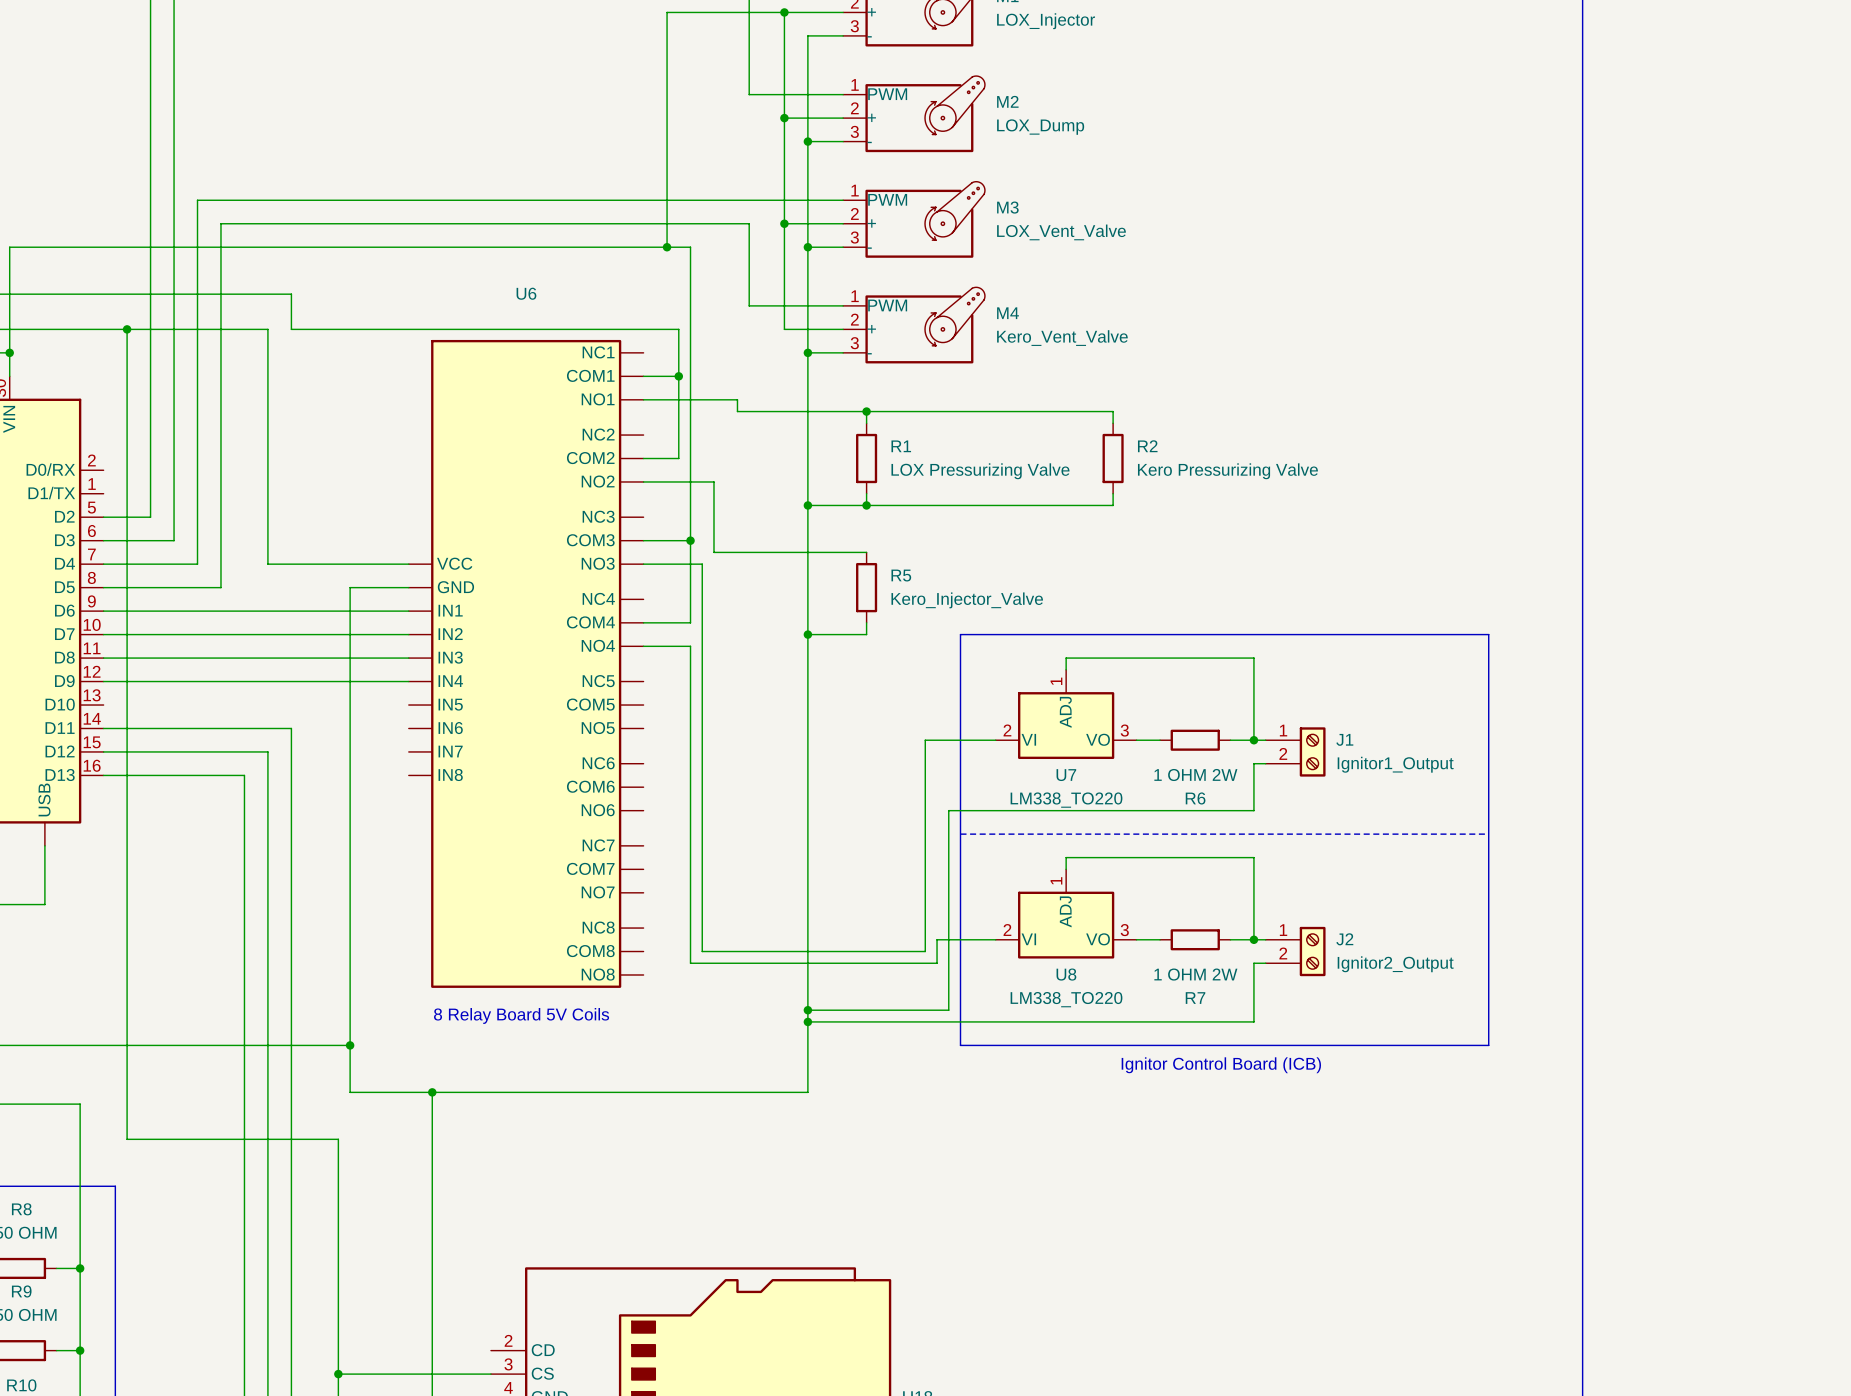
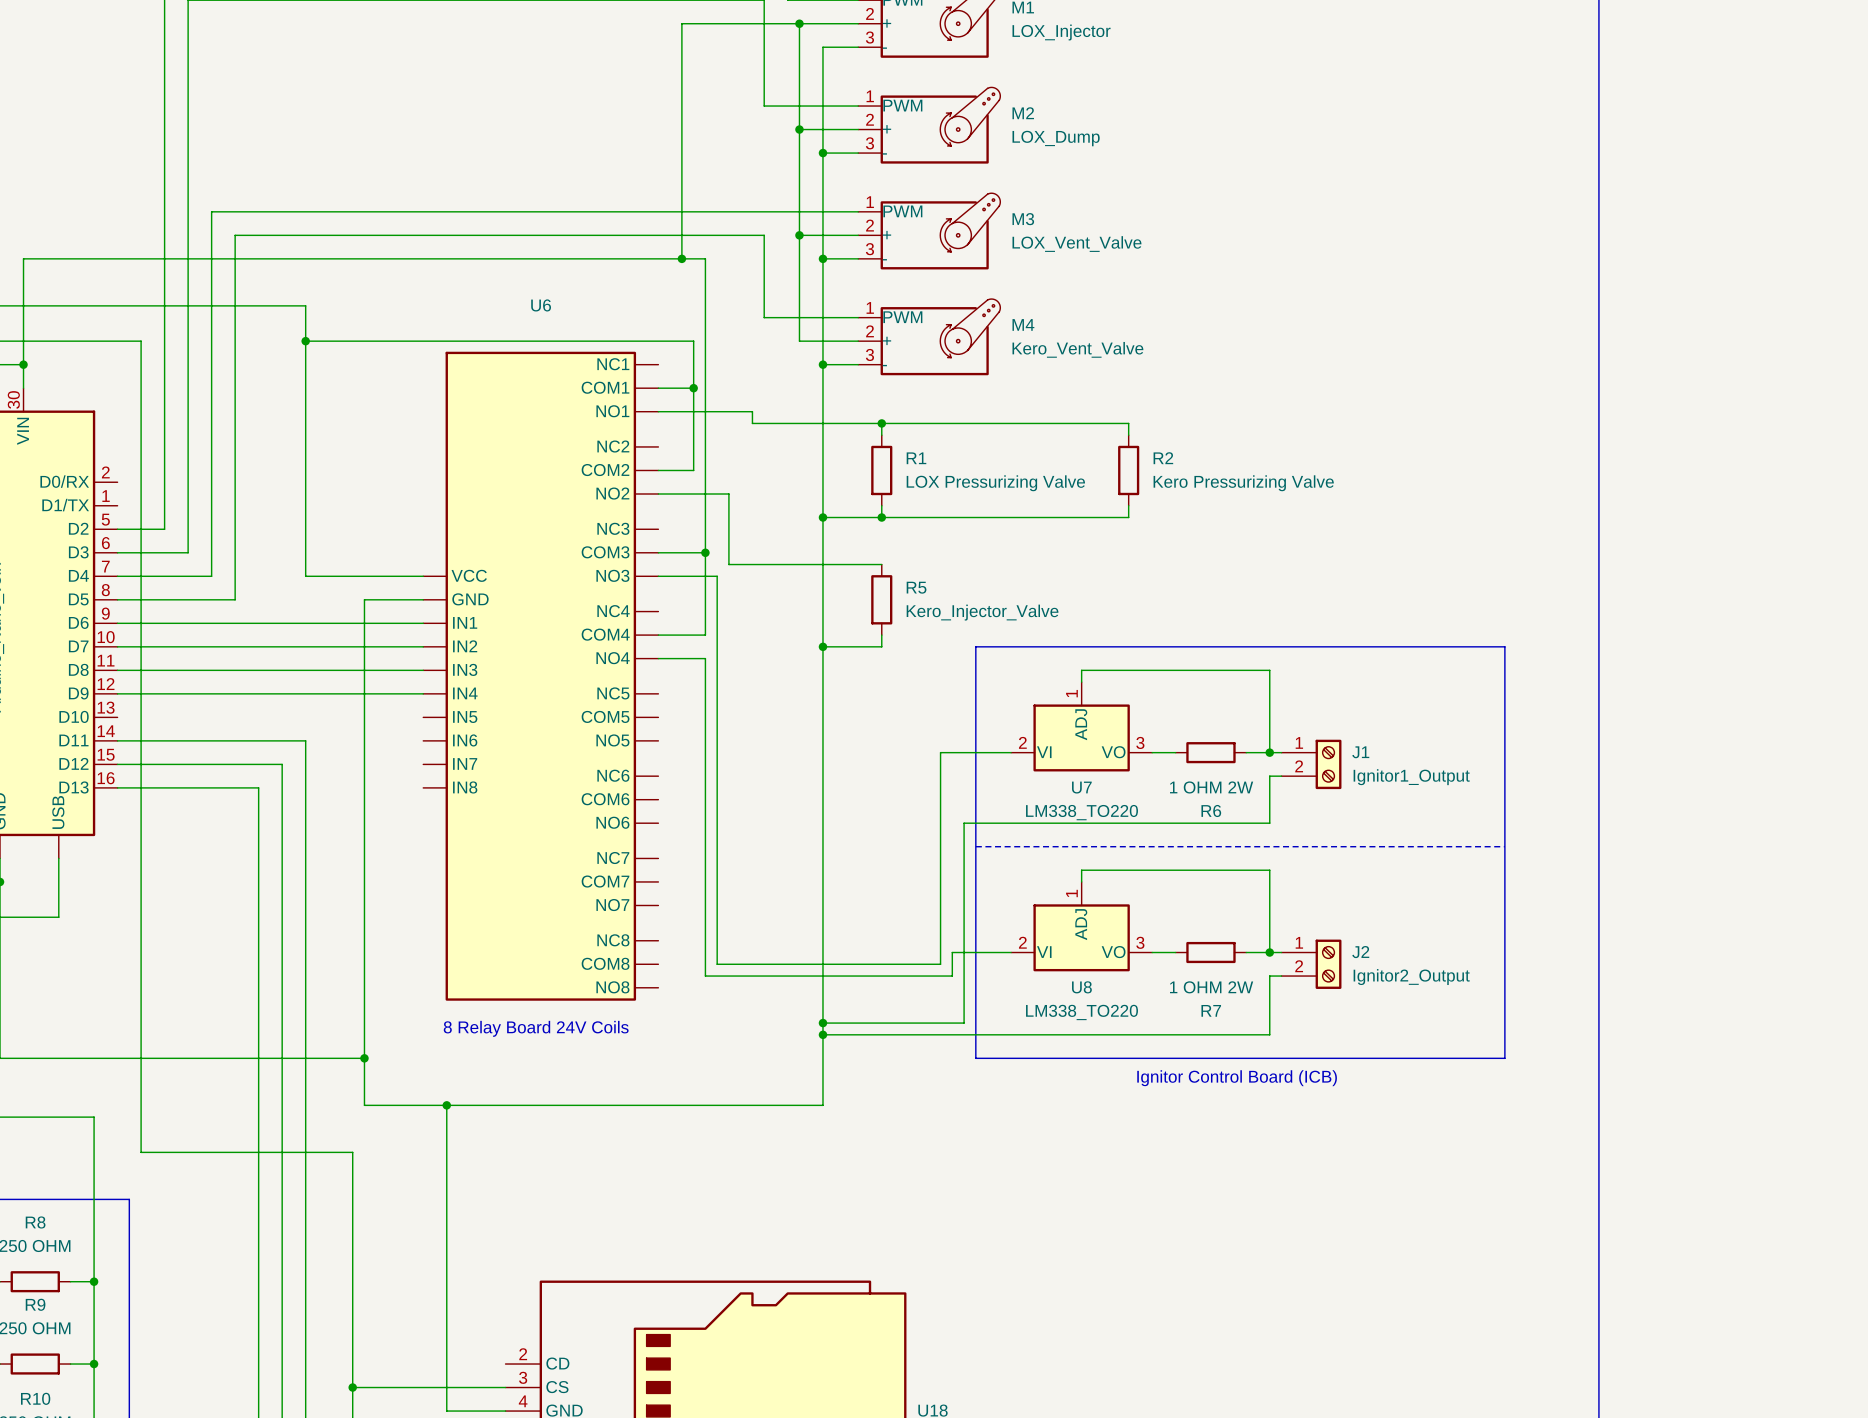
wire: (127, 329) (267, 329) (267, 564) (291, 564) -> (305, 341) (305, 576)
junction: (127, 329) -> none
junction: none -> (305, 341)
text: 8 Relay Board 5V Coils (521, 1015) -> 8 Relay Board 24V Coils (536, 1028)

